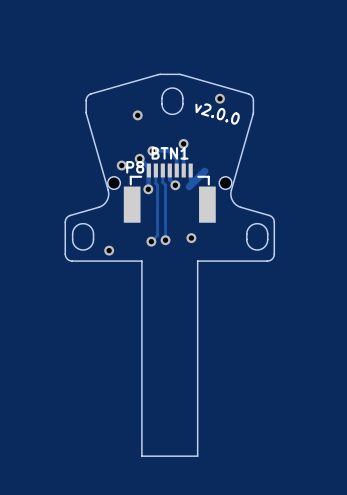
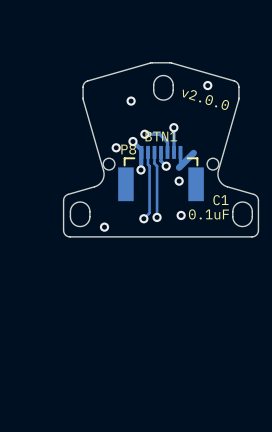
via: none -> (179, 181)
C1: none -> 0.1uF (208, 207)
board edge: (197, 261) (197, 456) (141, 456) (141, 261) -> (186, 236) (135, 236)

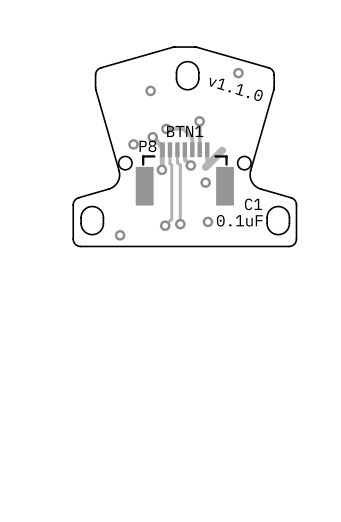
text: v2.0.0 (205, 99) -> v1.1.0 (236, 89)

